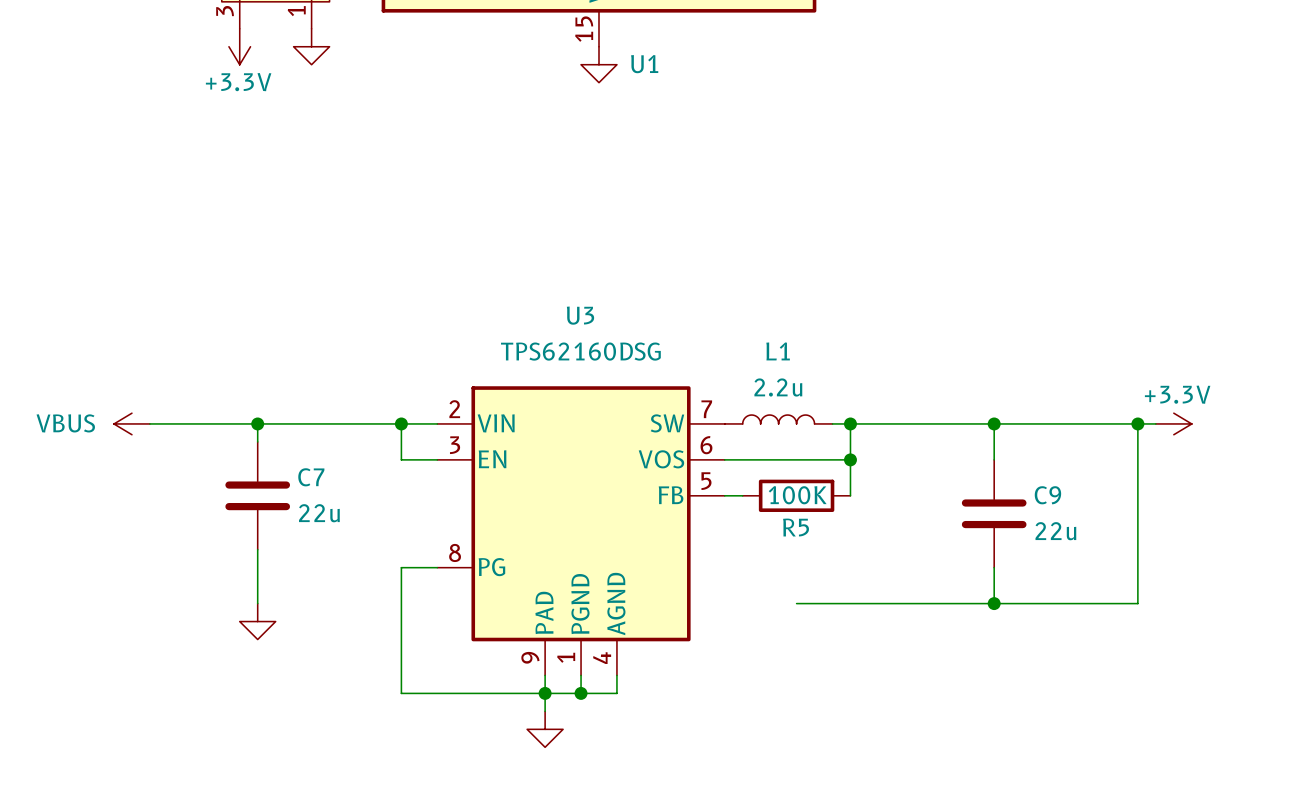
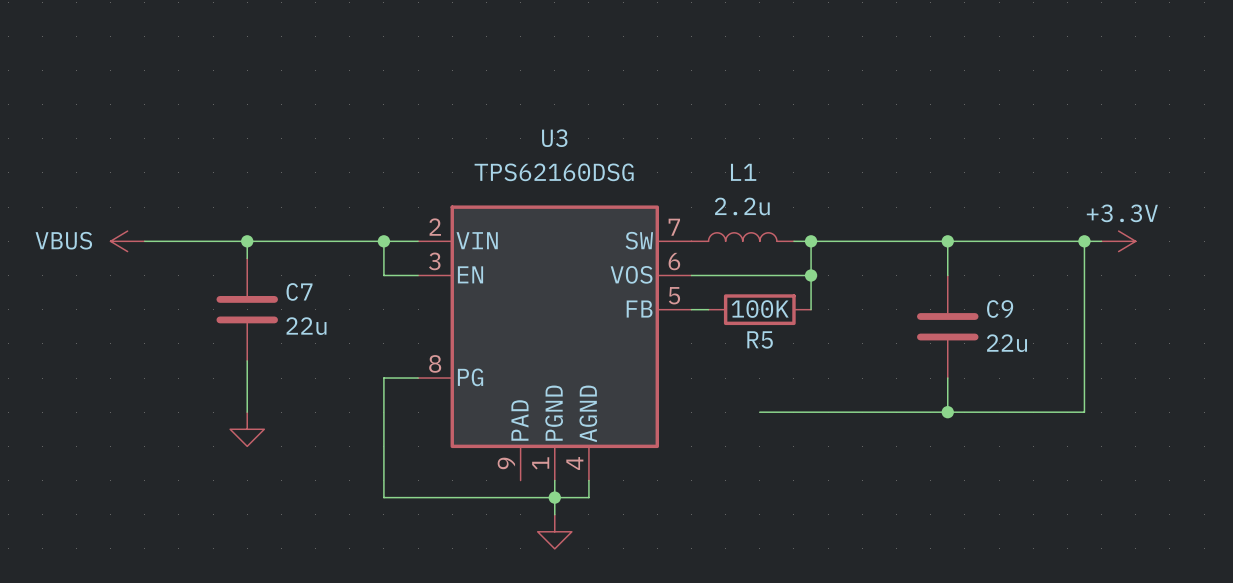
wire: (545, 675) (545, 711) -> none
junction: (545, 693) -> none
wire: none -> (554, 497) (554, 514)
power symbol position: (545, 729) -> (554, 531)

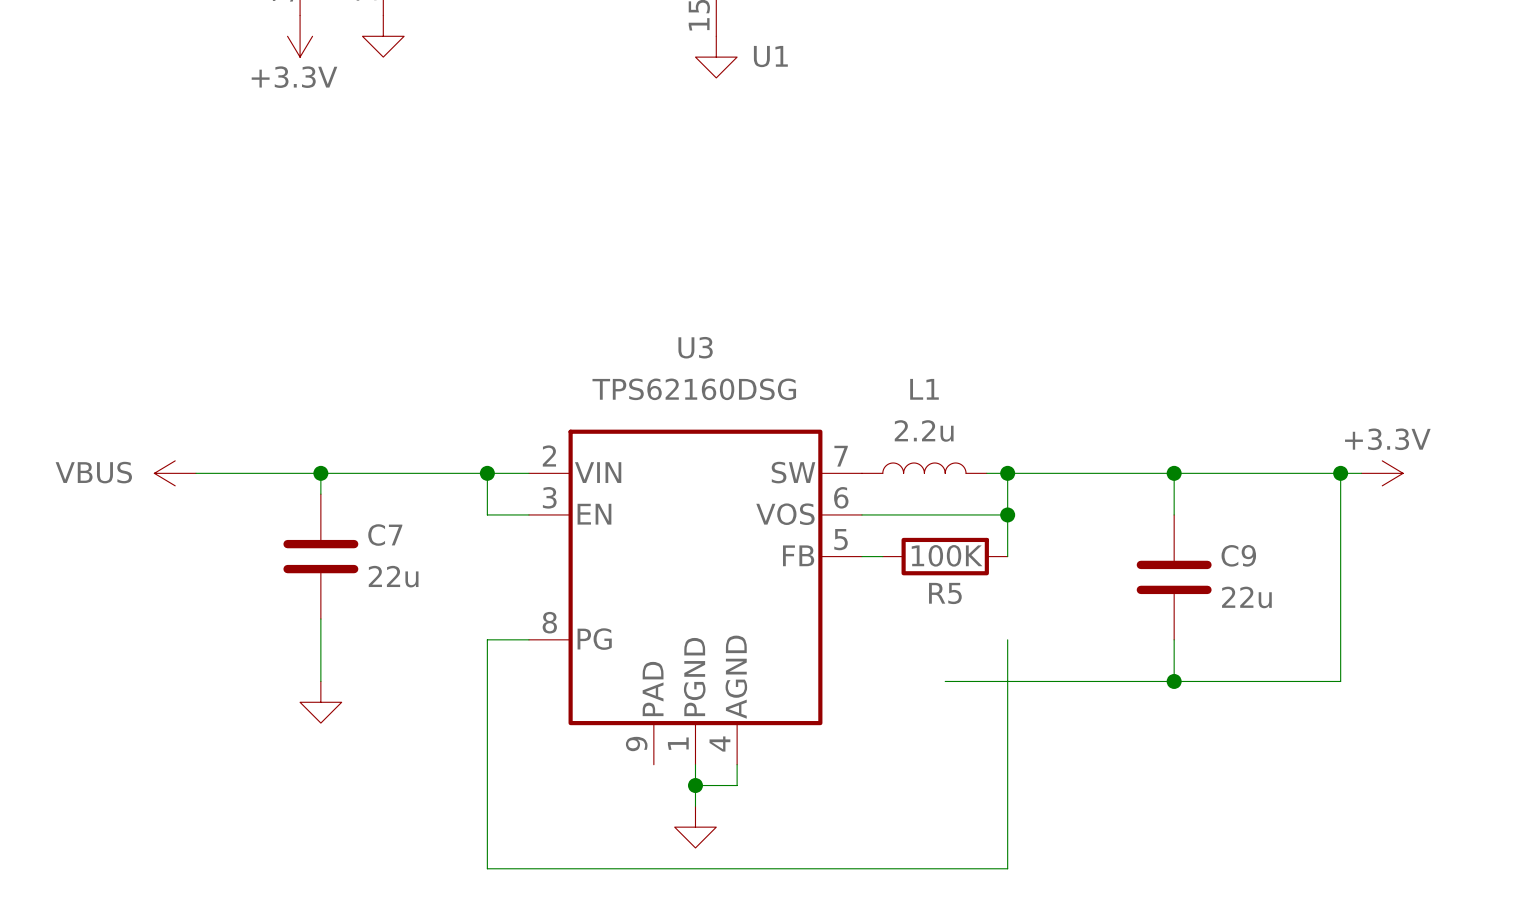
wire: (383, 497) (554, 497) -> (487, 785) (487, 868) (1007, 868) (1007, 639)

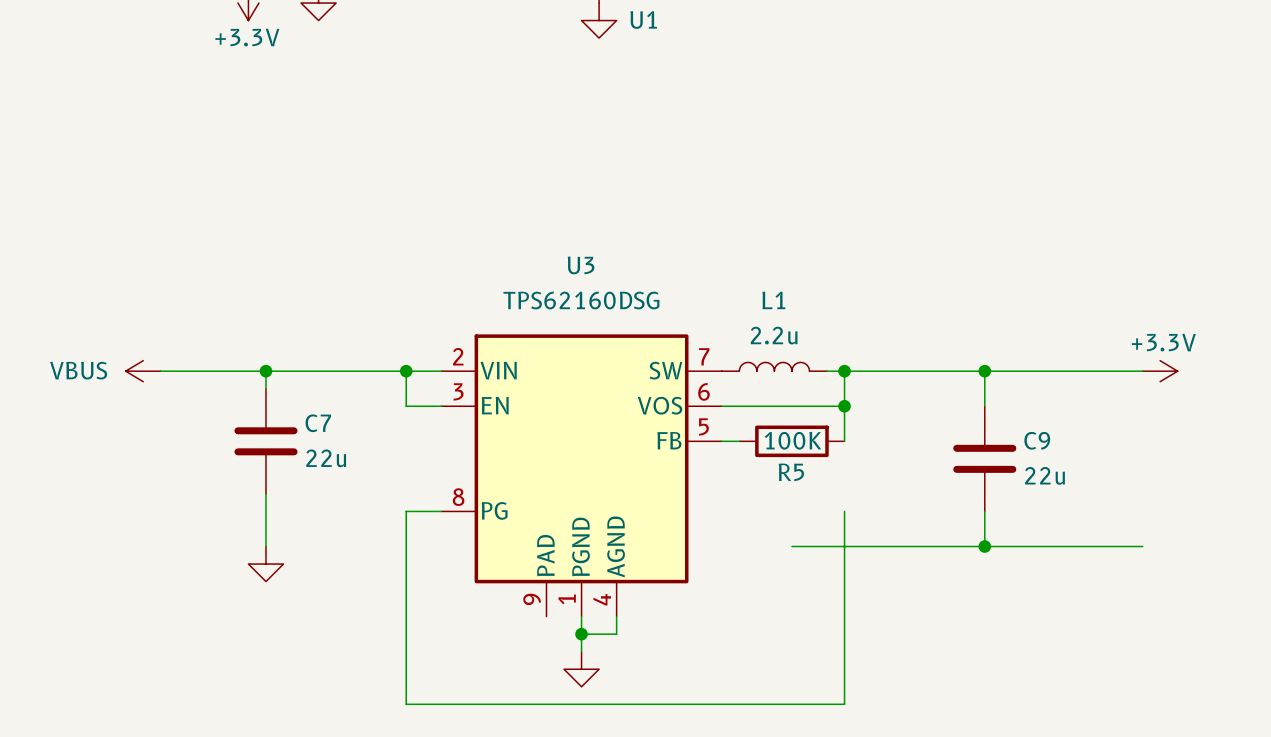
wire: (1340, 473) (1340, 681) -> (1142, 546) (1125, 546)
junction: (1340, 473) -> none

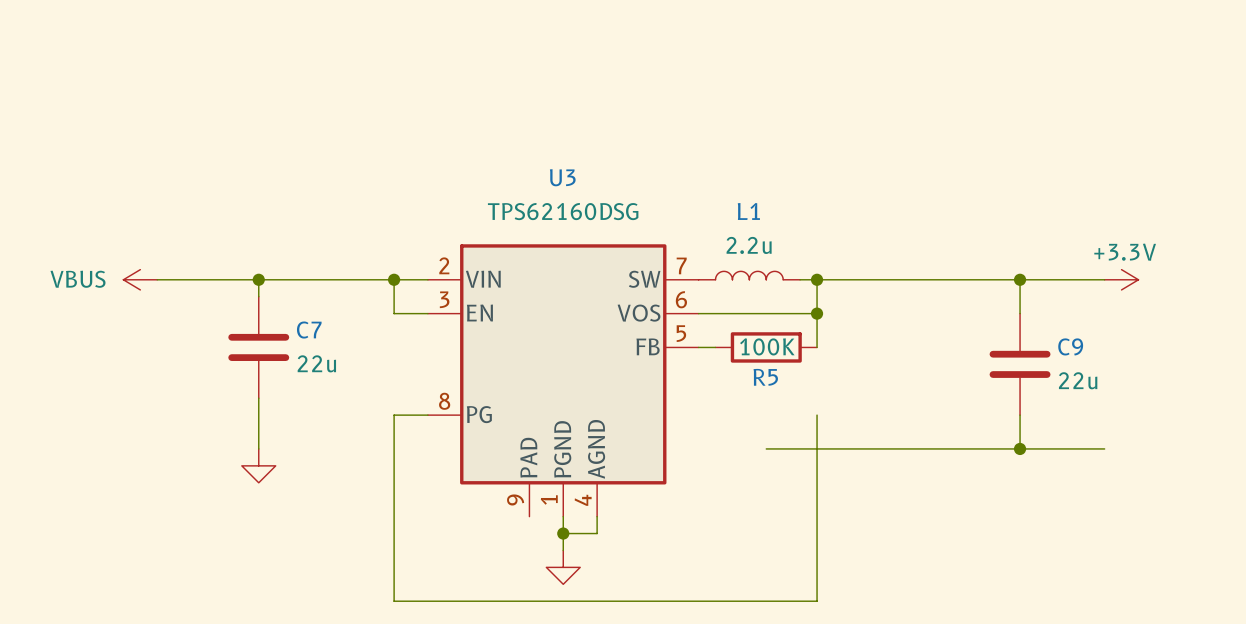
wire: (984, 371) (984, 406) -> (1020, 279) (1020, 313)
junction position: (984, 371) -> (1020, 279)
C9 position: (984, 458) -> (1020, 364)
wire: (984, 511) (984, 546) -> (1020, 415) (1020, 448)
junction position: (984, 546) -> (1020, 448)

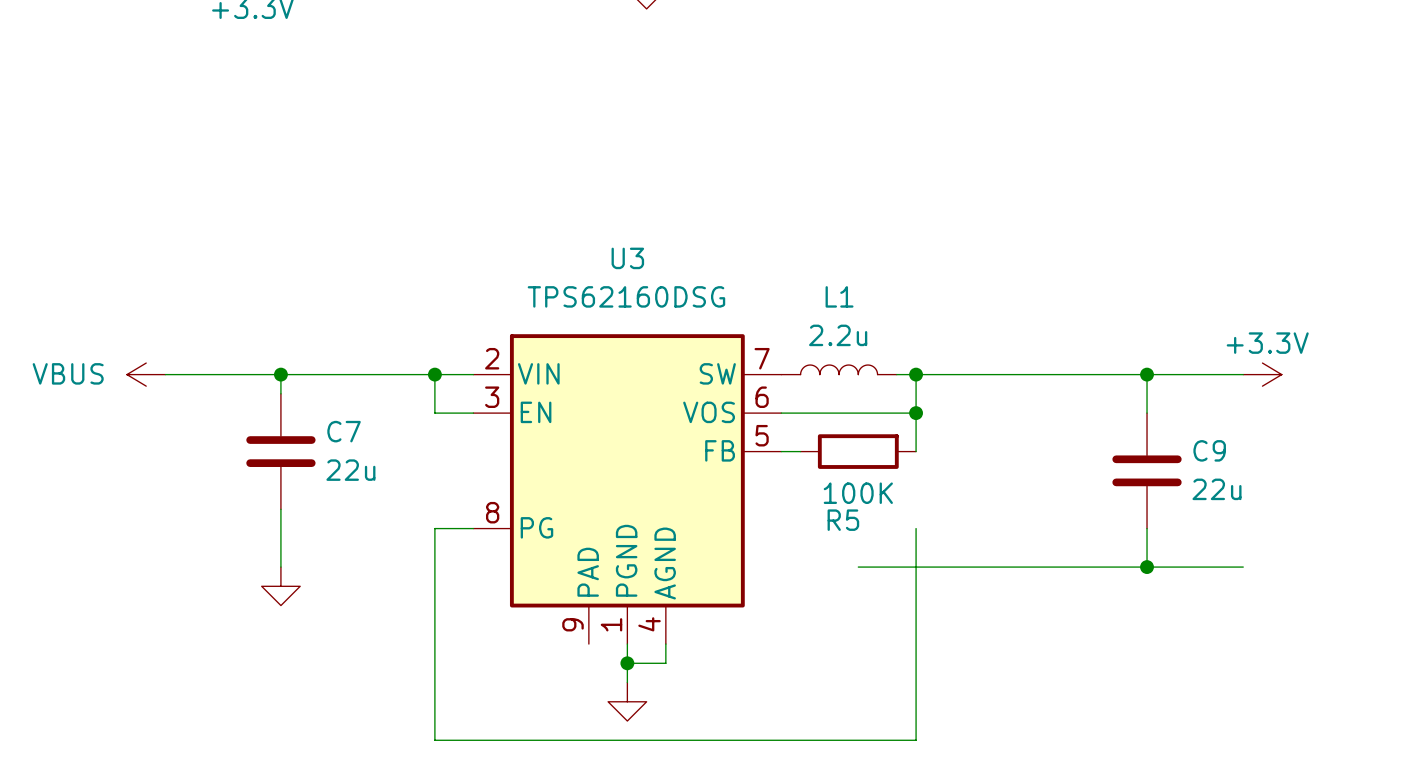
R5 value position: 100K (767, 346) -> 100K (858, 493)
R5 name position: R5 (765, 377) -> R5 (843, 520)

